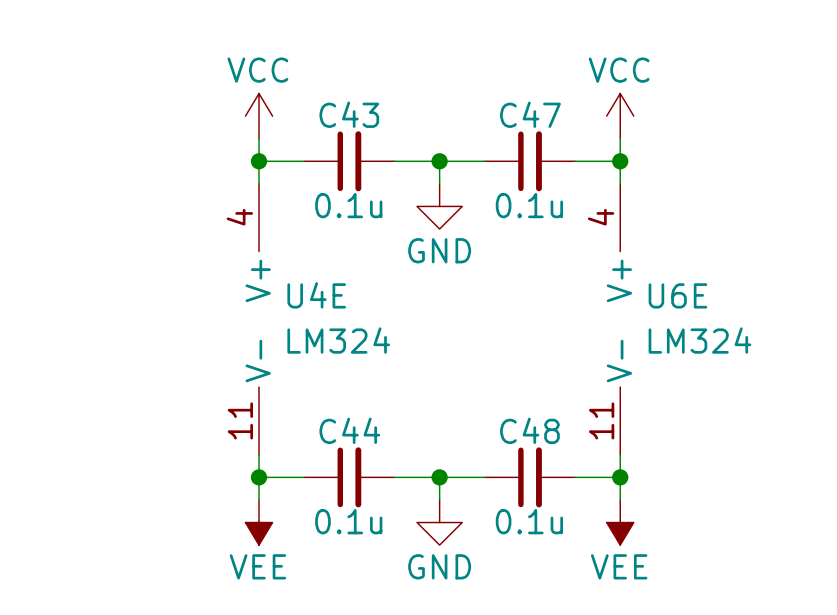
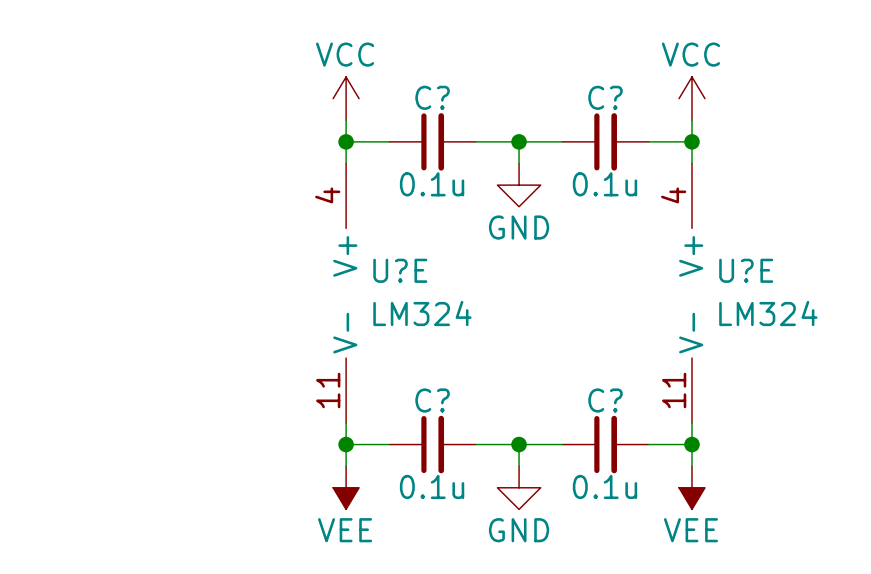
C43 name: C43 (349, 114) -> C? (432, 97)
C47 name: C47 (530, 114) -> C? (605, 97)
U4E name: U4E (316, 295) -> U?E (400, 270)
U6E name: U6E (677, 295) -> U?E (746, 270)
C44 name: C44 (349, 430) -> C? (432, 400)
C48 name: C48 (529, 430) -> C? (605, 400)

